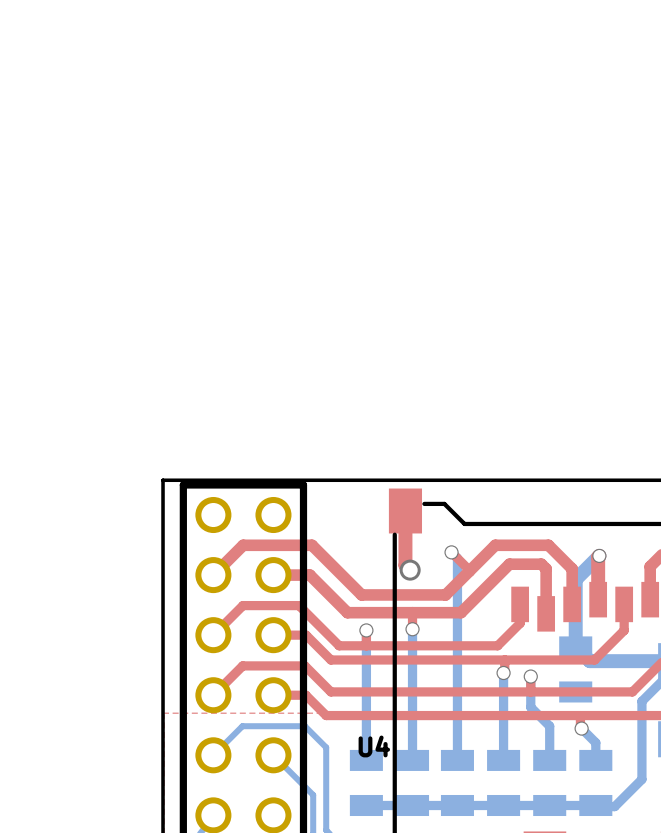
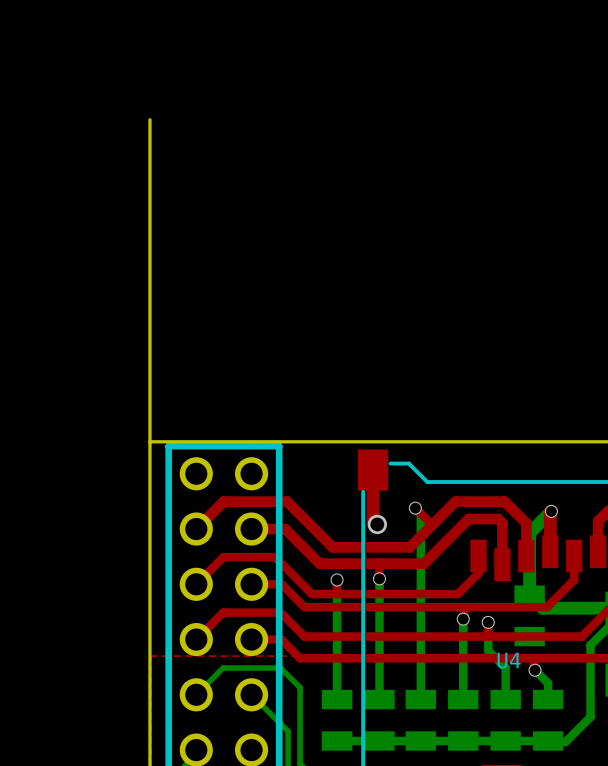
board edge: none -> (149, 119) (149, 441)
U4 name position: U4 (374, 746) -> U4 (509, 660)

